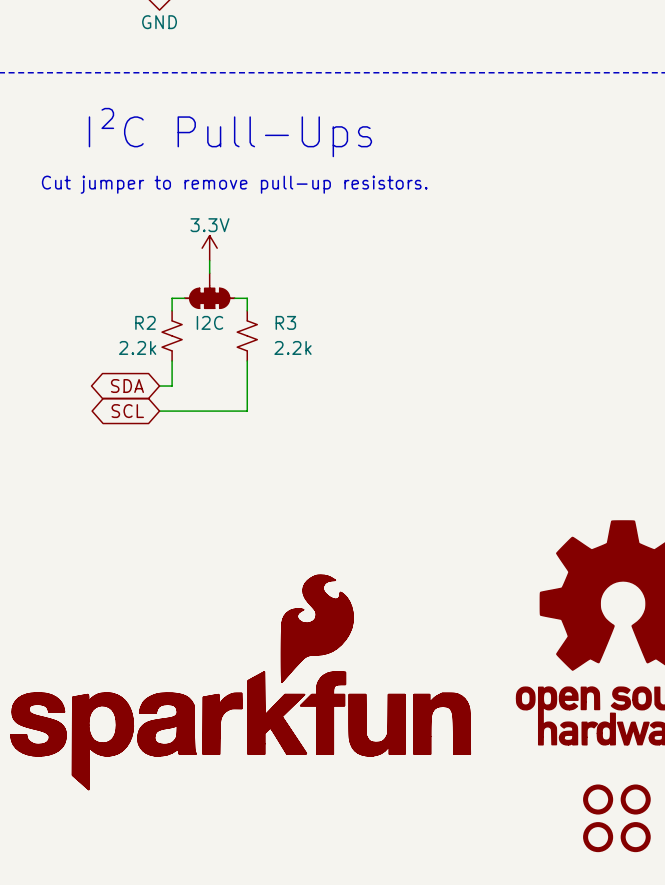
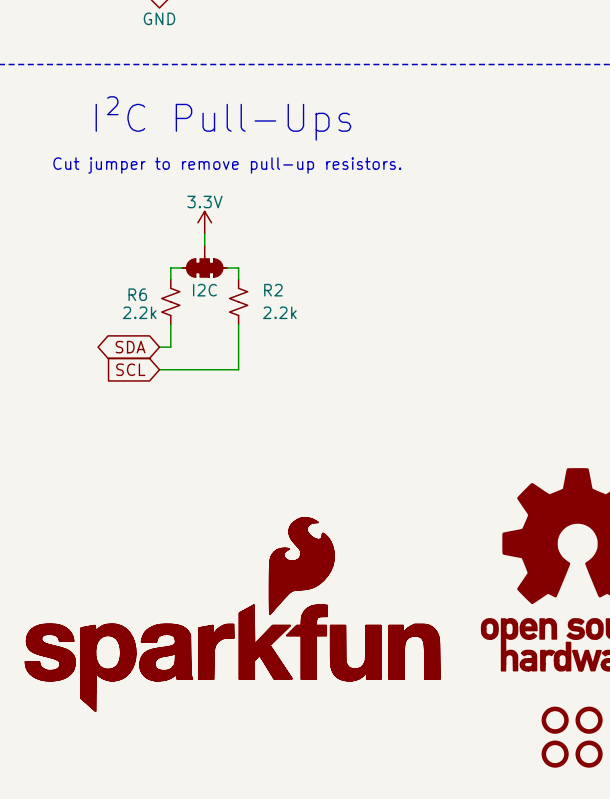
R2 name: R2 (145, 322) -> R6 (137, 294)
R3 name: R3 (285, 322) -> R2 (273, 290)
global label shape: bidirectional (127, 411) -> input (130, 369)

